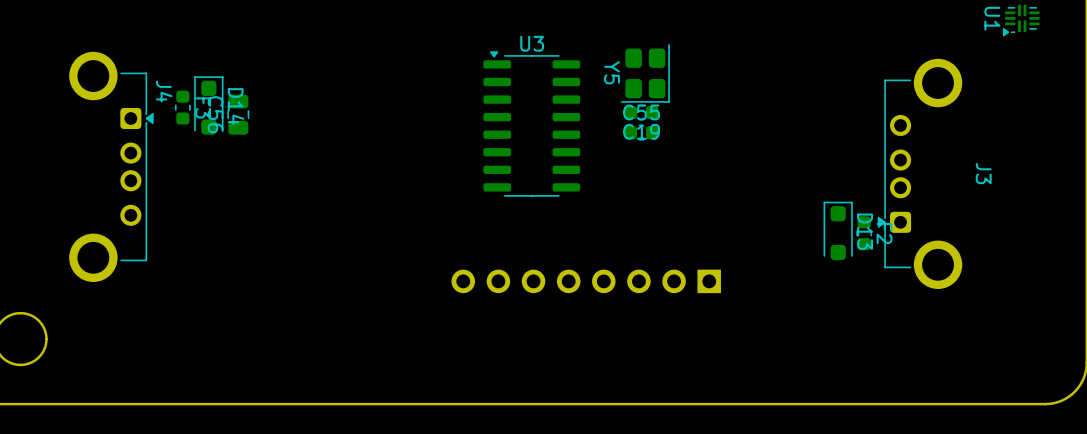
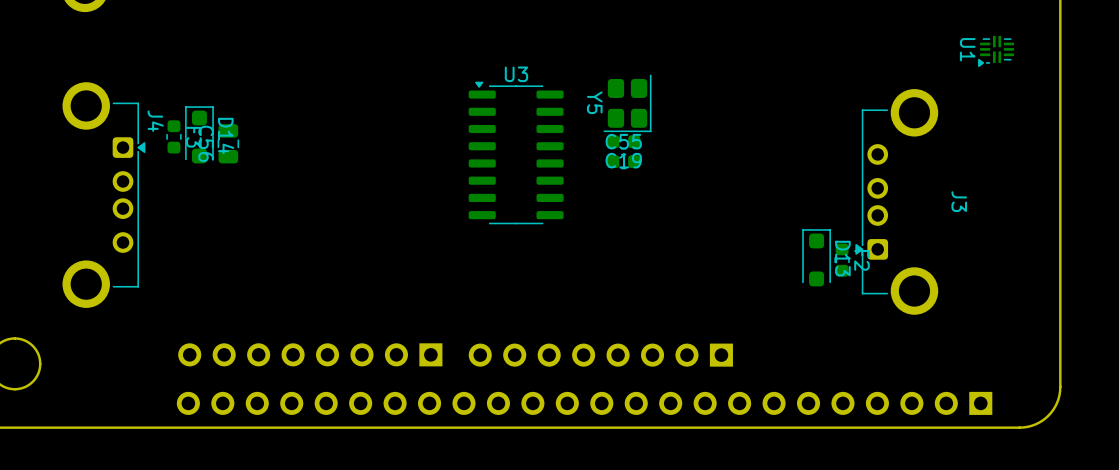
part position: (586, 281) -> (600, 355)
part: none -> (310, 354)
part: none -> (584, 403)

